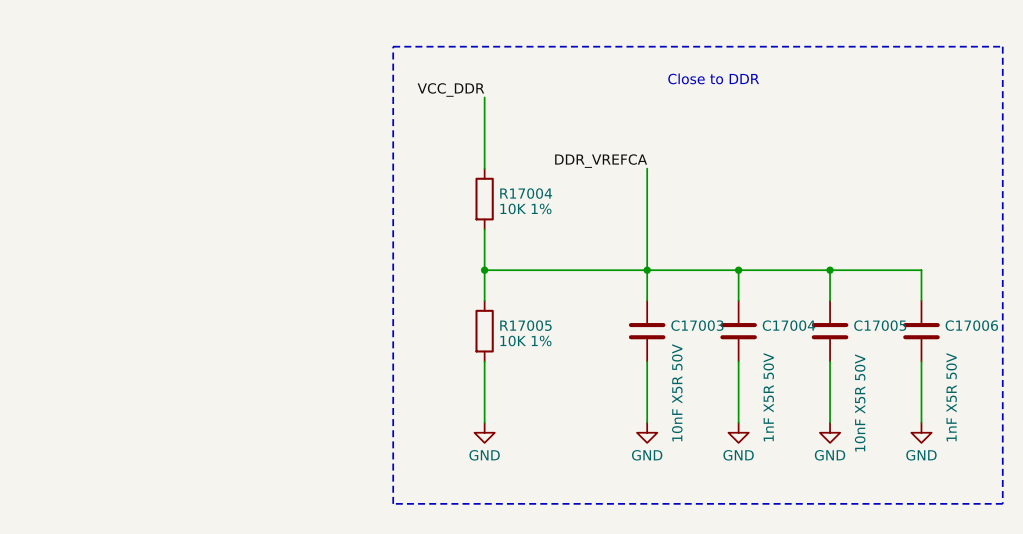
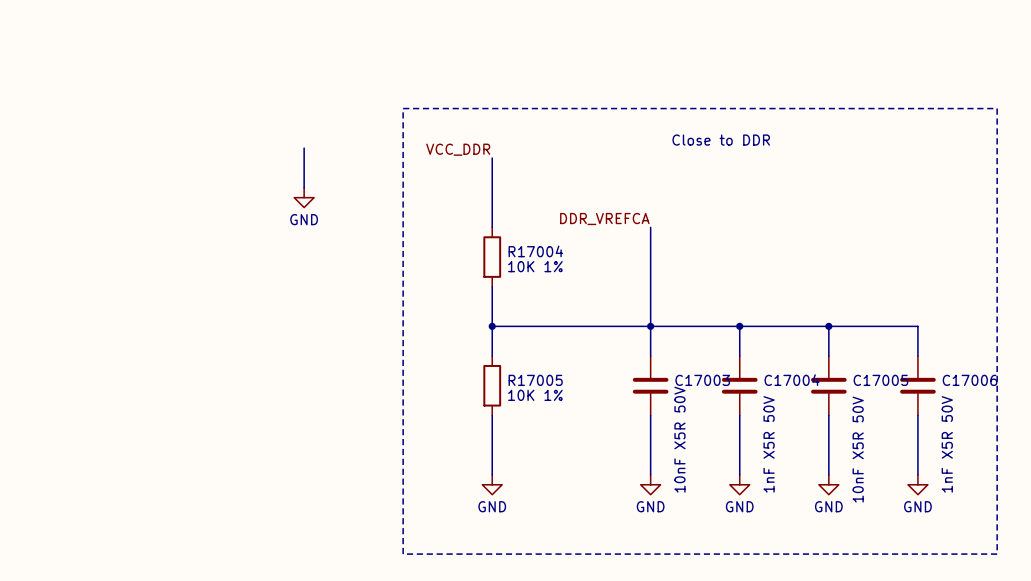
wire: none -> (304, 148) (304, 187)
power symbol: none -> GND (304, 197)

